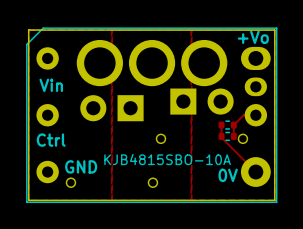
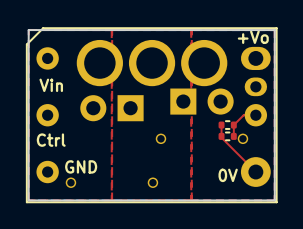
part value: KJB4815SBO-10A (167, 159) -> none

